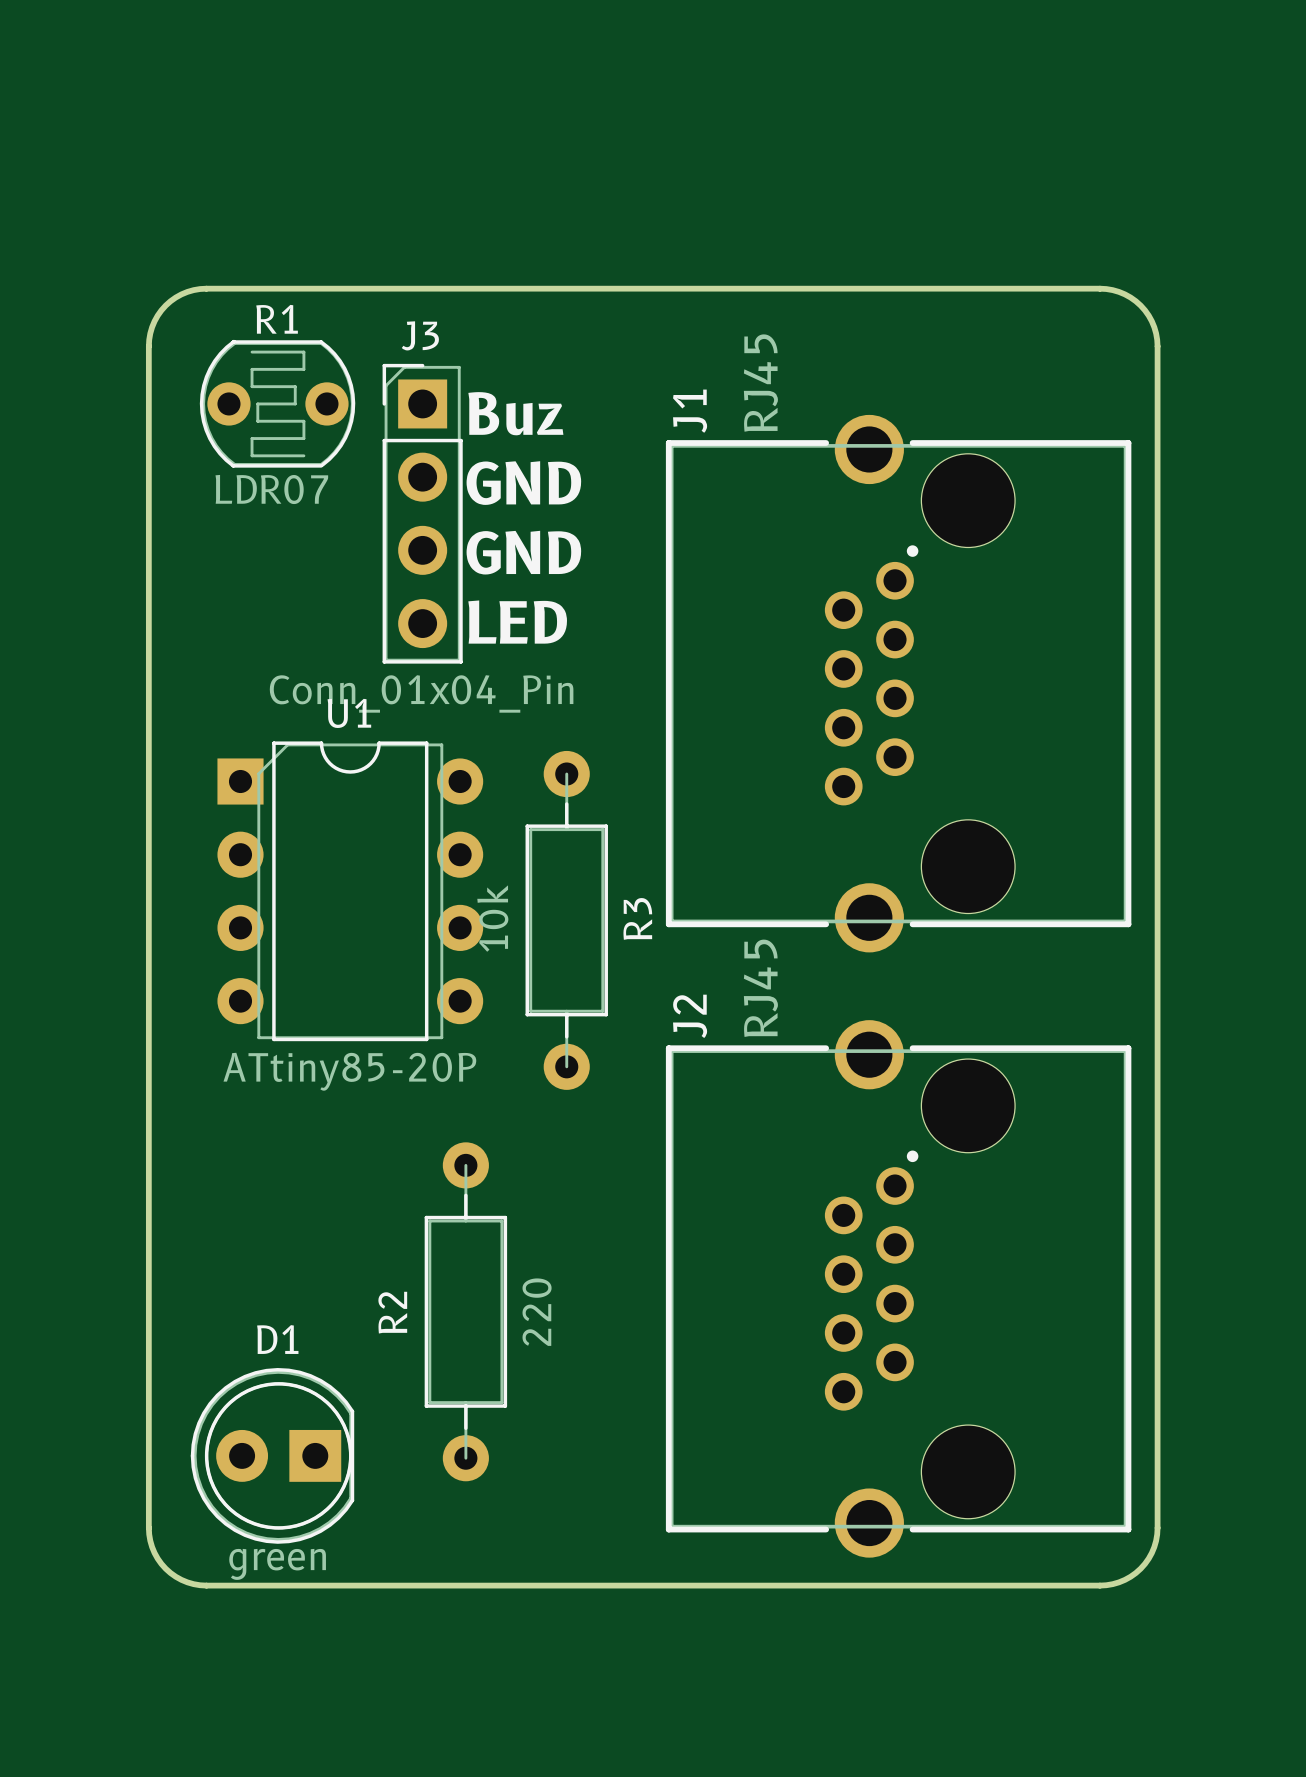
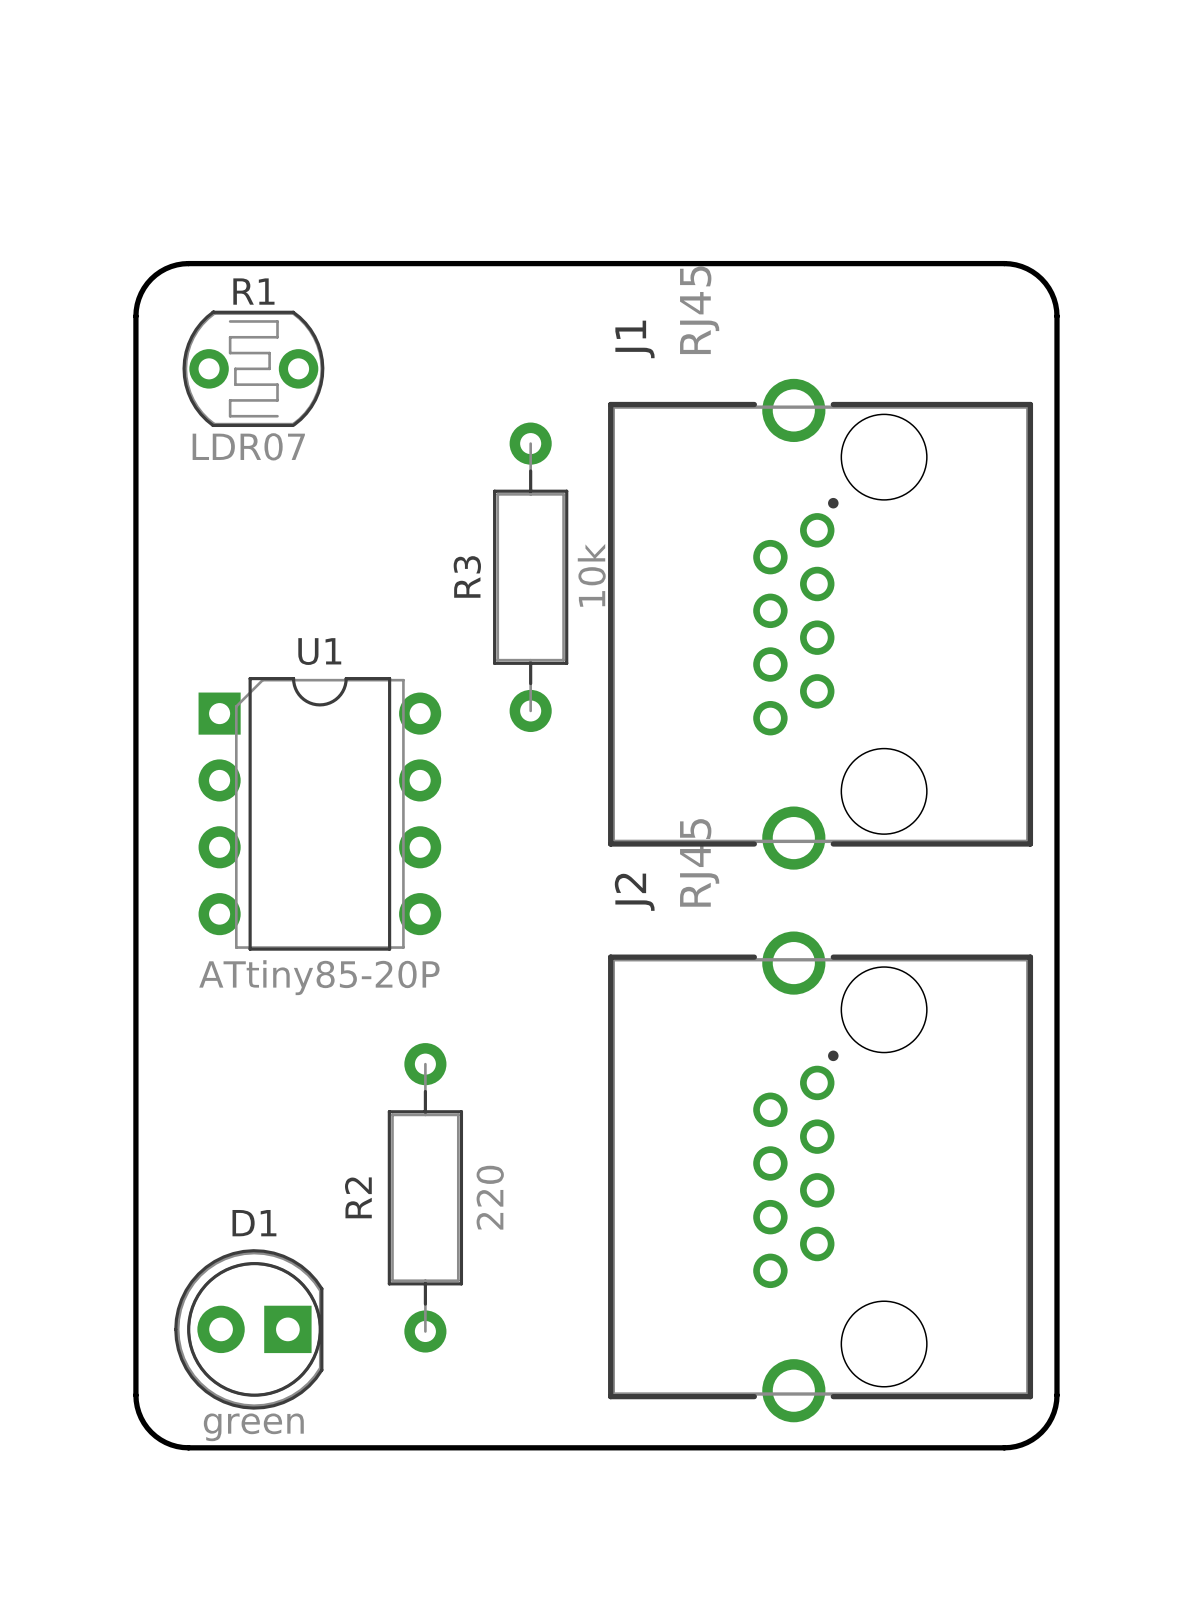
J1 value position: RJ45 (760, 383) -> RJ45 (699, 310)
J1 name position: J1 (690, 411) -> J1 (634, 339)
text: Buz (515, 413) -> none
text: GND (523, 483) -> none
J3: Conn_01x04_Pin (422, 513) -> none
text: GND (523, 552) -> none
text: LED (517, 622) -> none
R3 value position: 10k (492, 918) -> 10k (591, 575)
R3 name position: R3 (637, 918) -> R3 (467, 576)
R3 position: (566, 920) -> (530, 577)
J2 value position: RJ45 (760, 988) -> RJ45 (699, 862)
J2 name position: J2 (690, 1016) -> J2 (634, 892)

